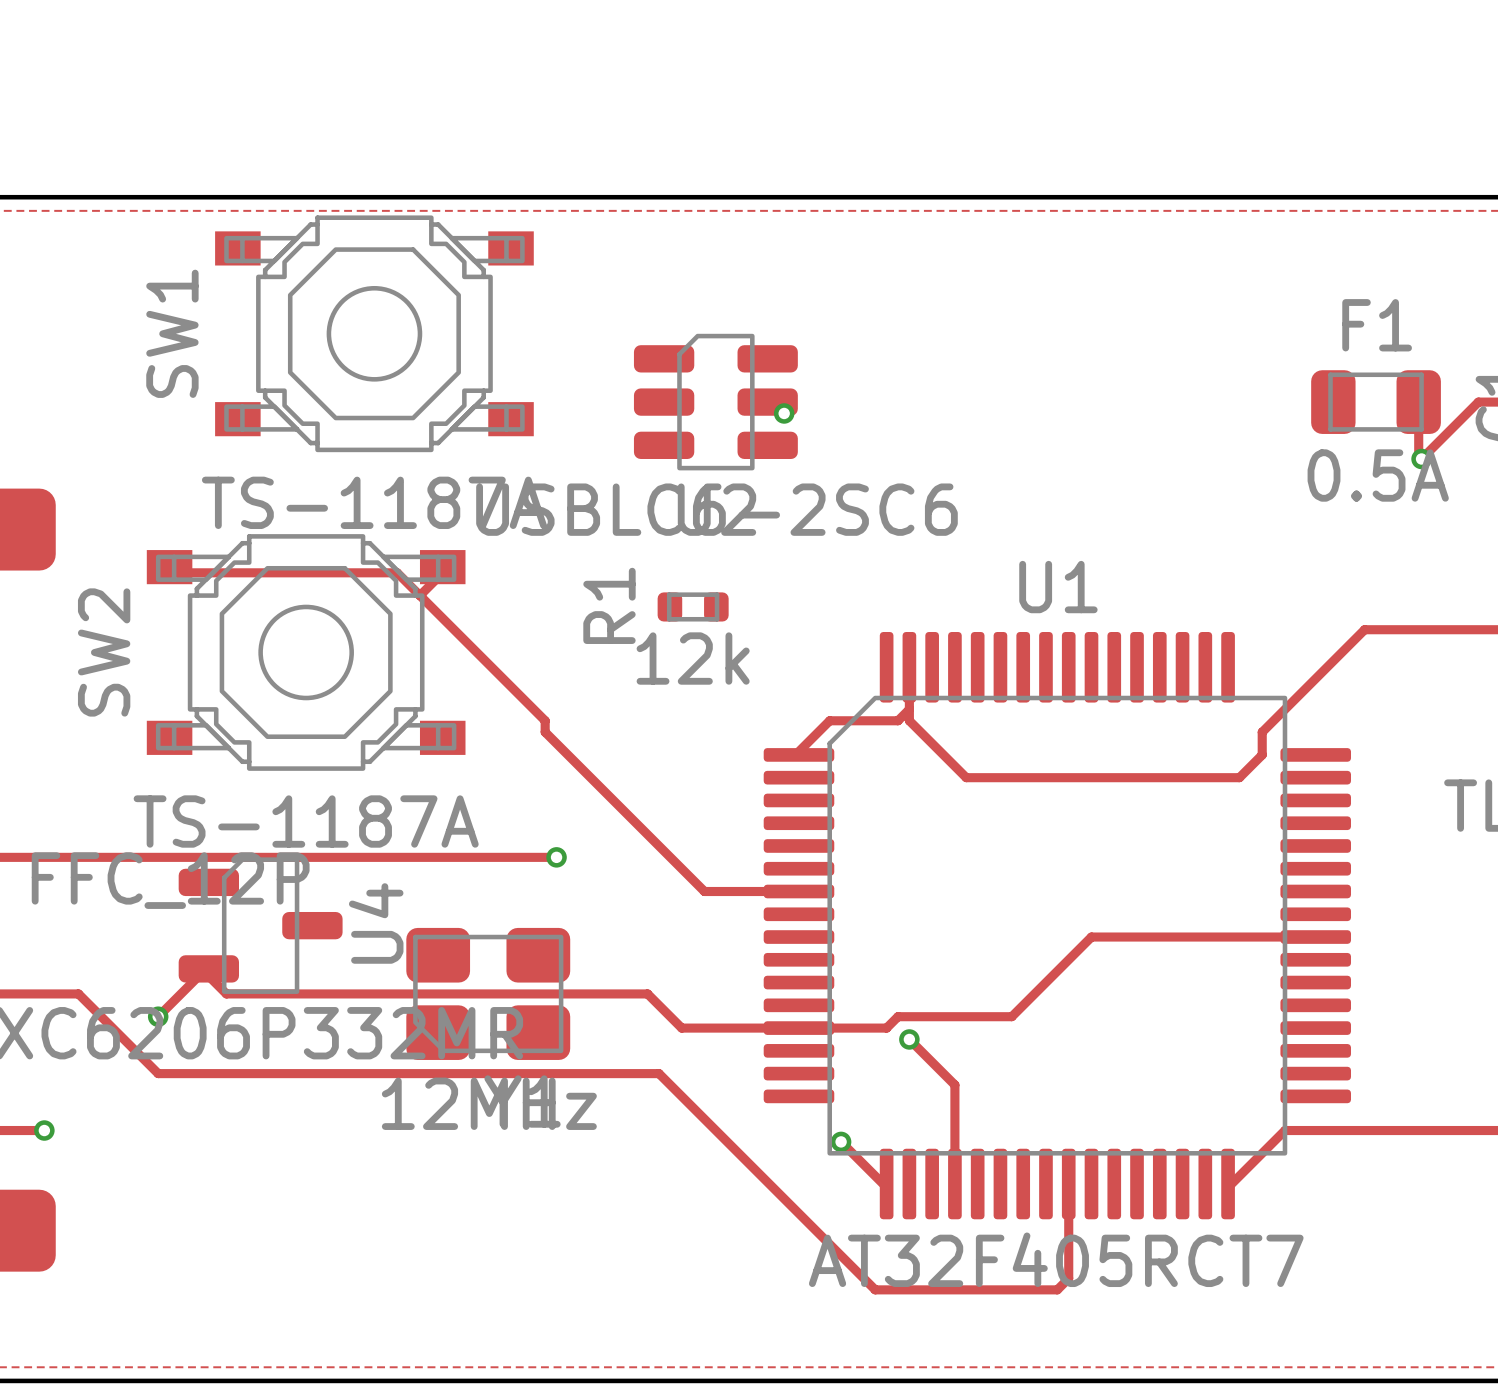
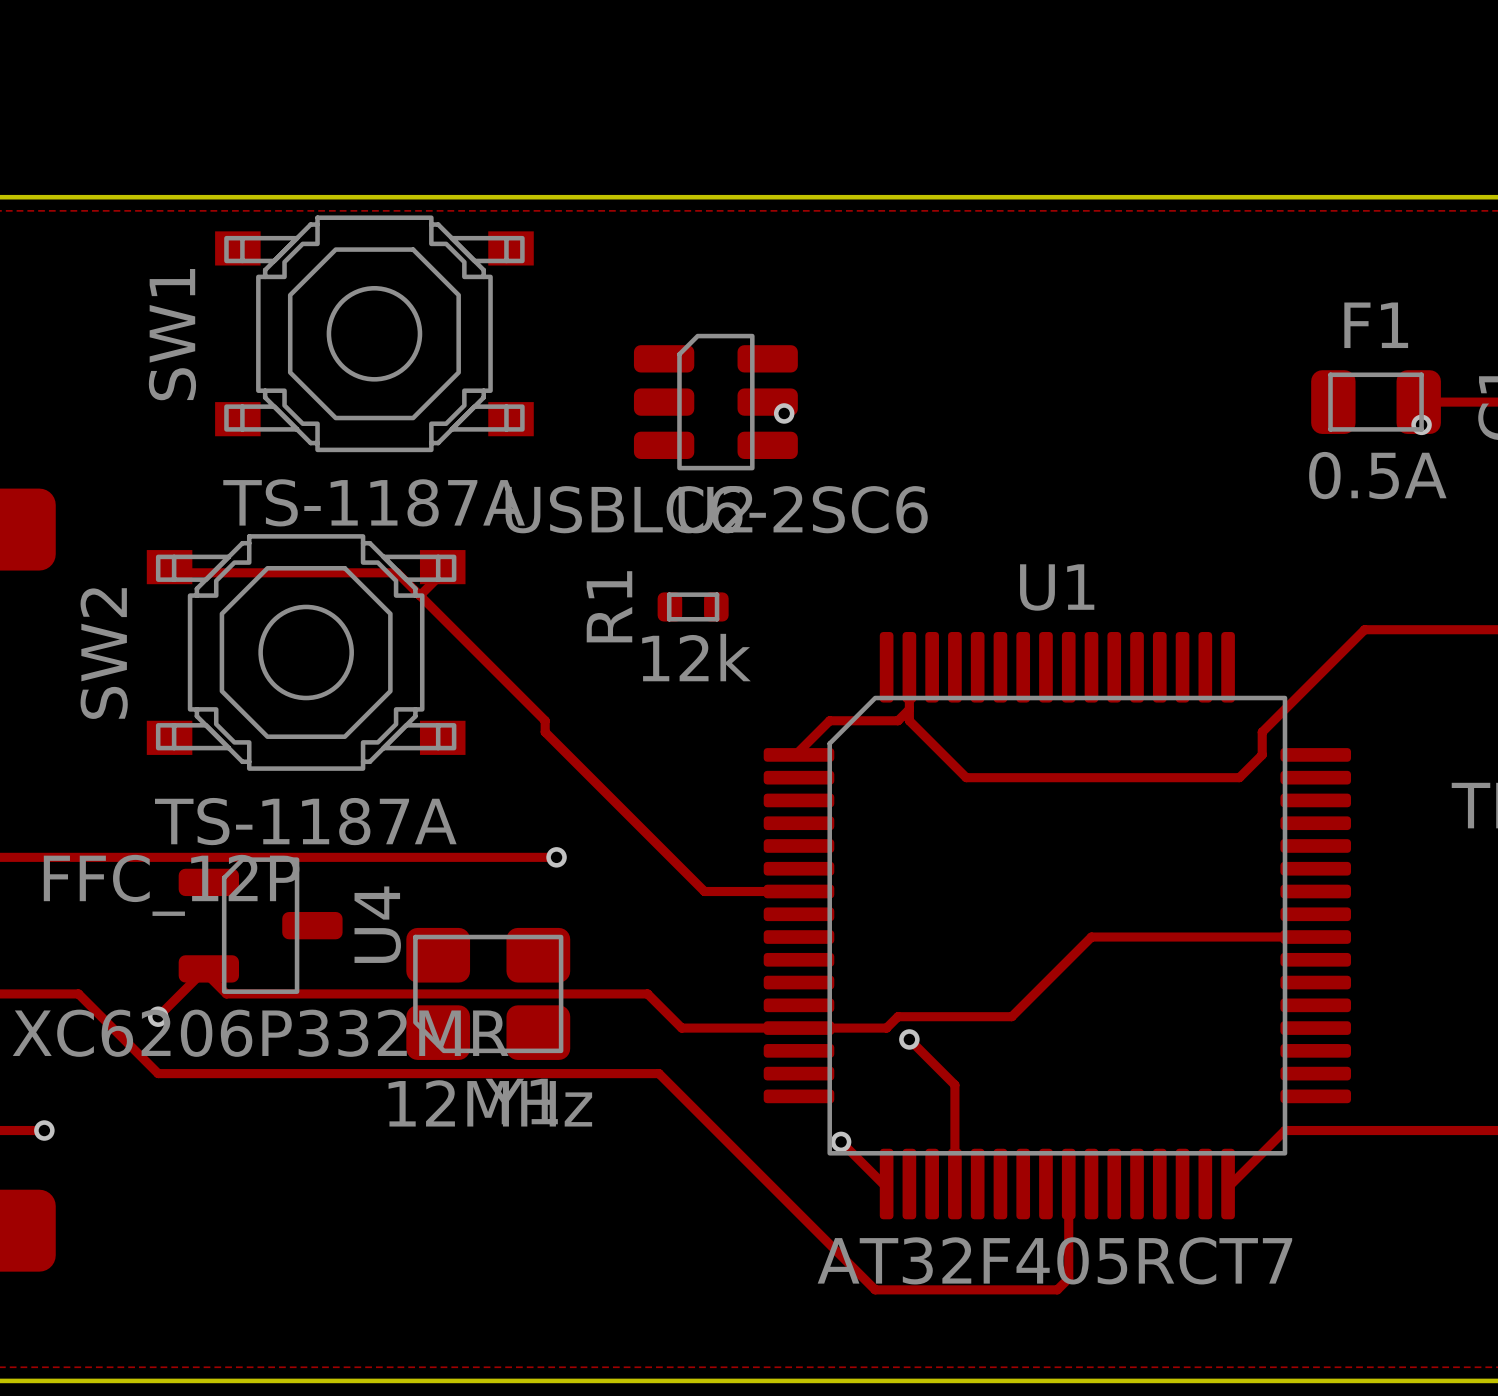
track: (1418, 402) (1418, 454) (1421, 458) (1478, 402) -> (1418, 402) (1478, 402)
via position: (1421, 458) -> (1421, 424)

